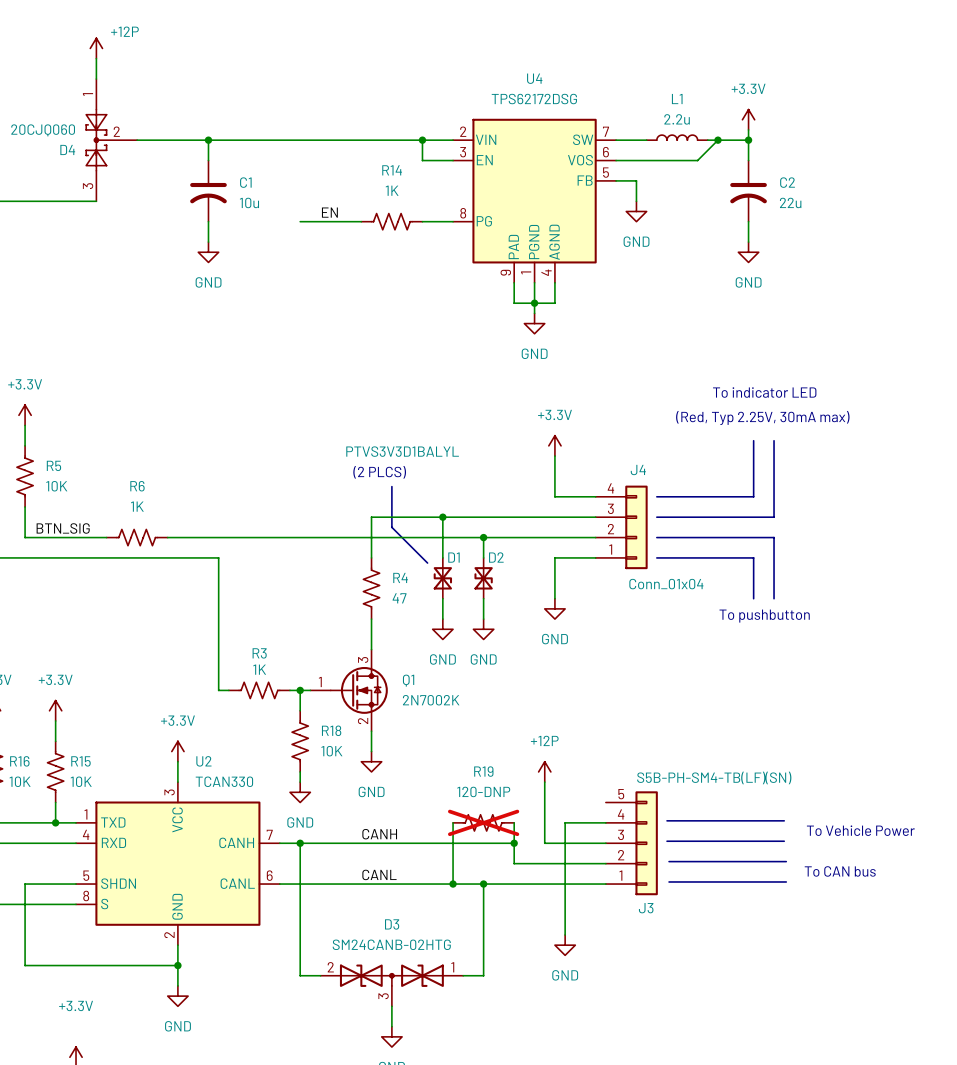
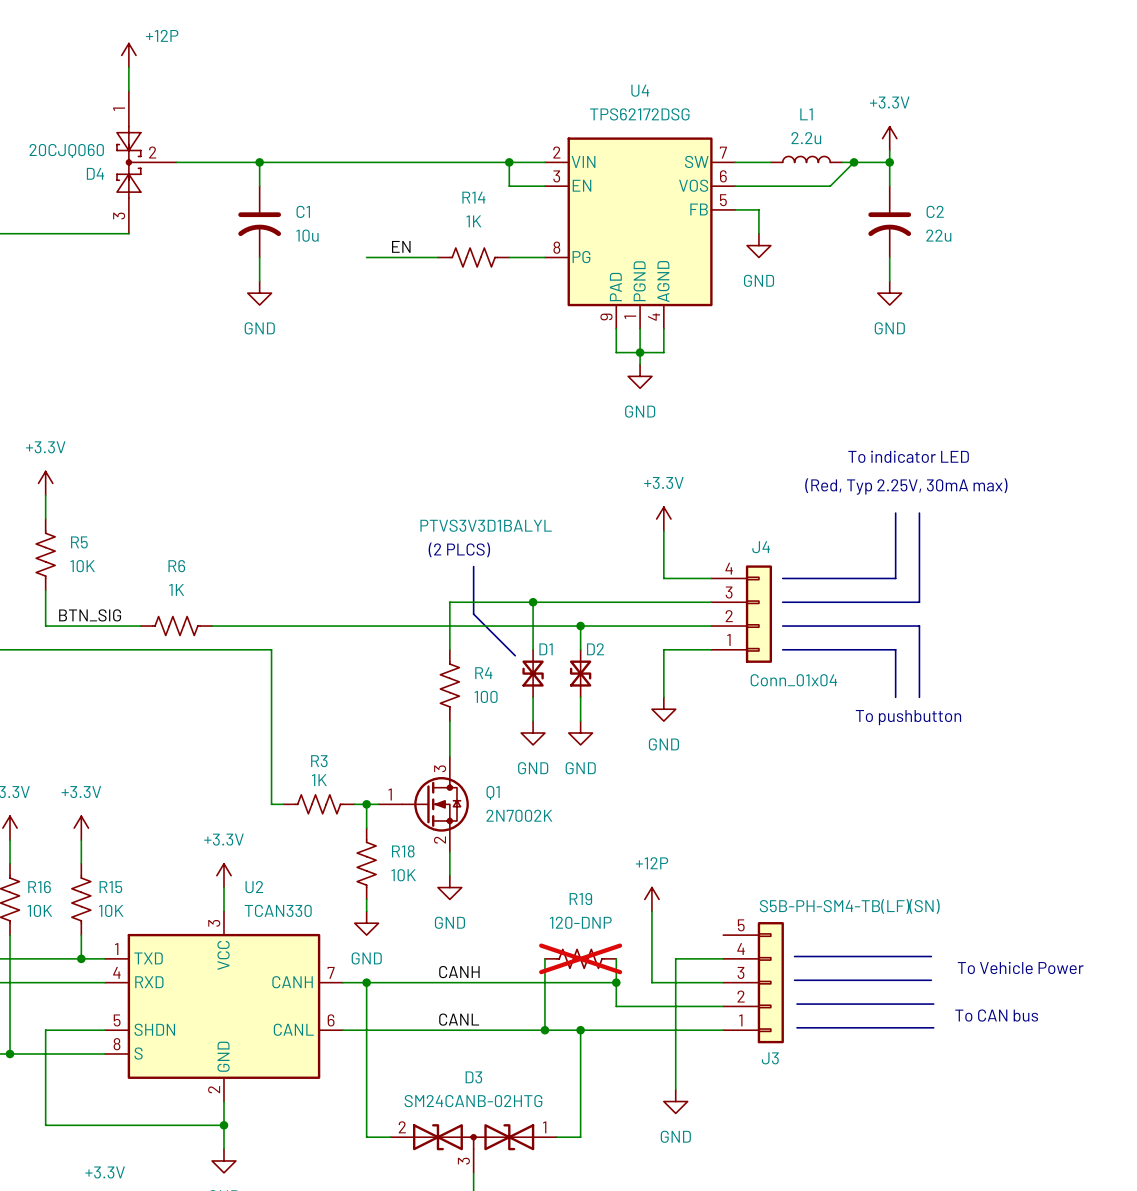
R4 value: 47 (399, 598) -> 100 (486, 696)

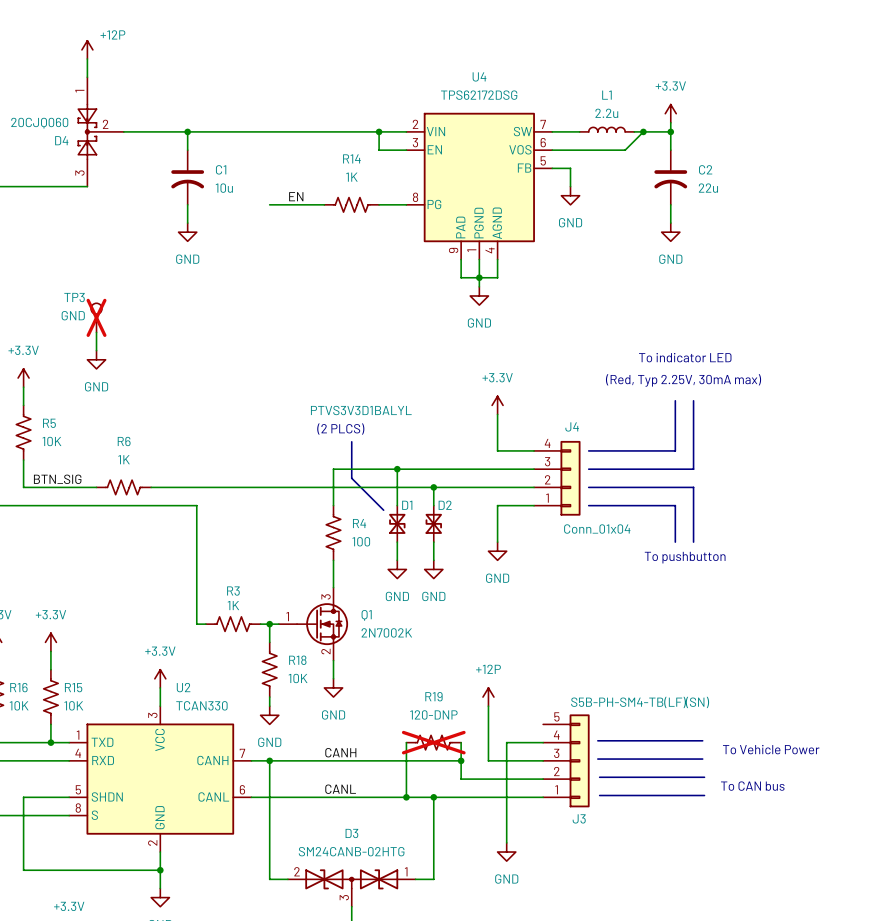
TP3: none -> GND (96, 317)
wire: none -> (96, 332) (96, 350)
power symbol: none -> GND (96, 359)

